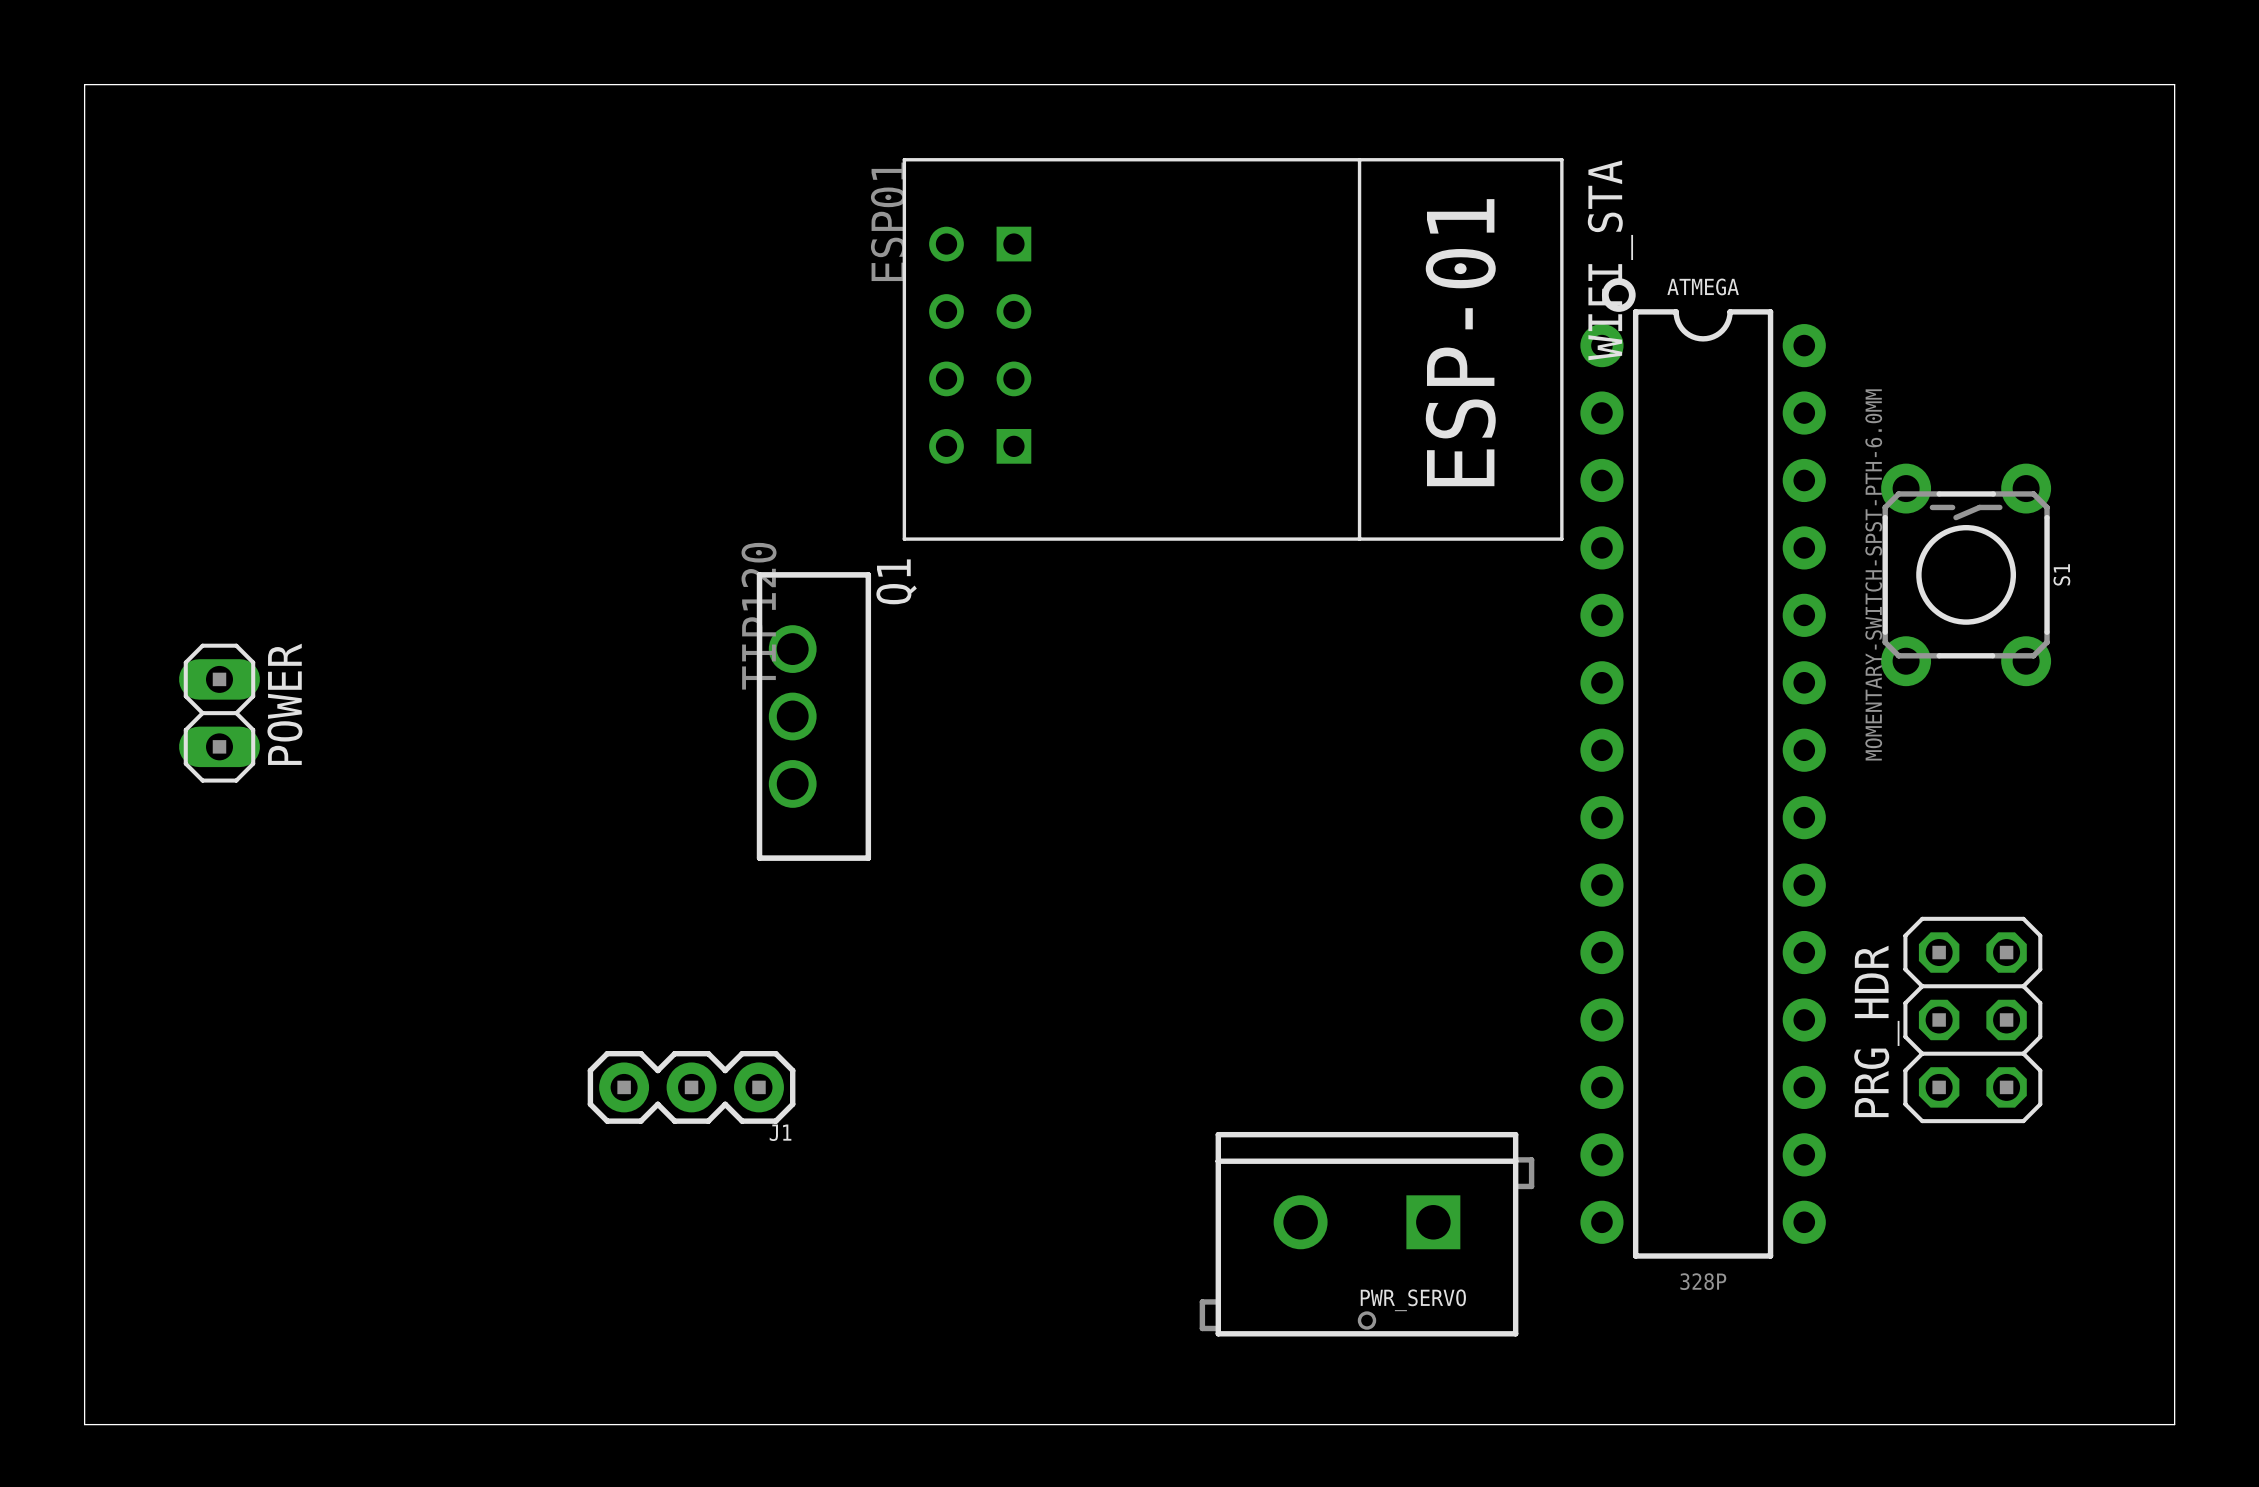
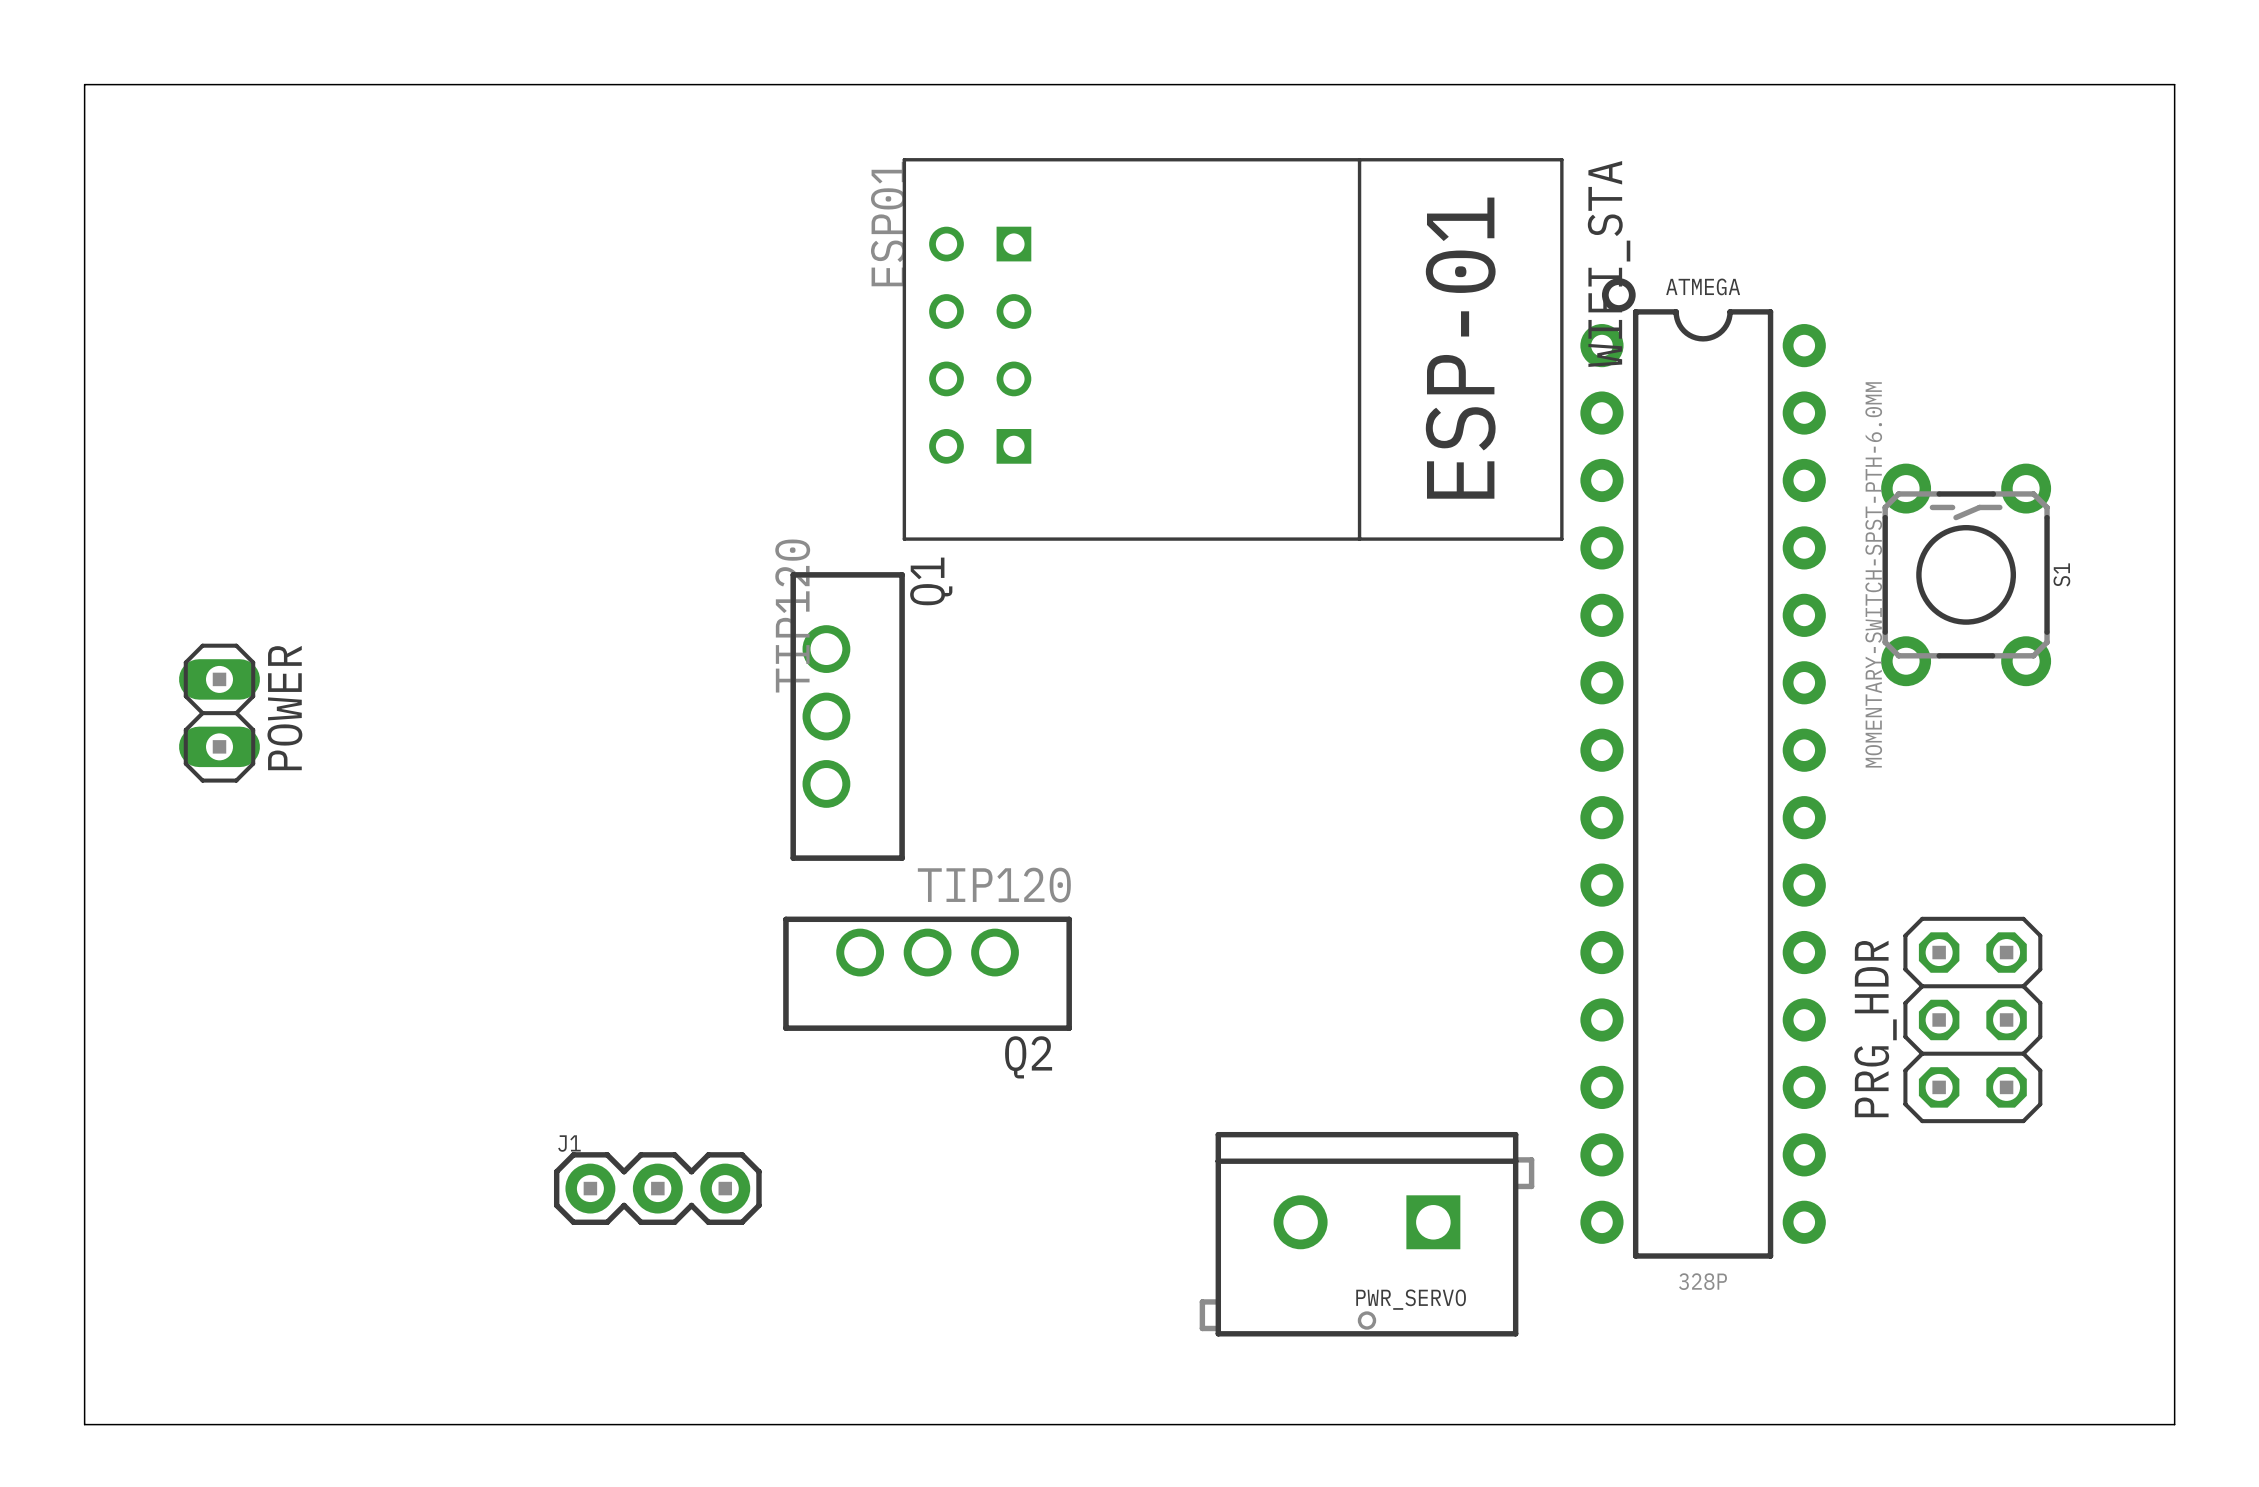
Q1 position: (813, 716) -> (847, 716)
Q2: none -> TIP120 (927, 973)
J1 position: (691, 1087) -> (657, 1188)
J1 name position: J1 (780, 1132) -> J1 (569, 1143)

